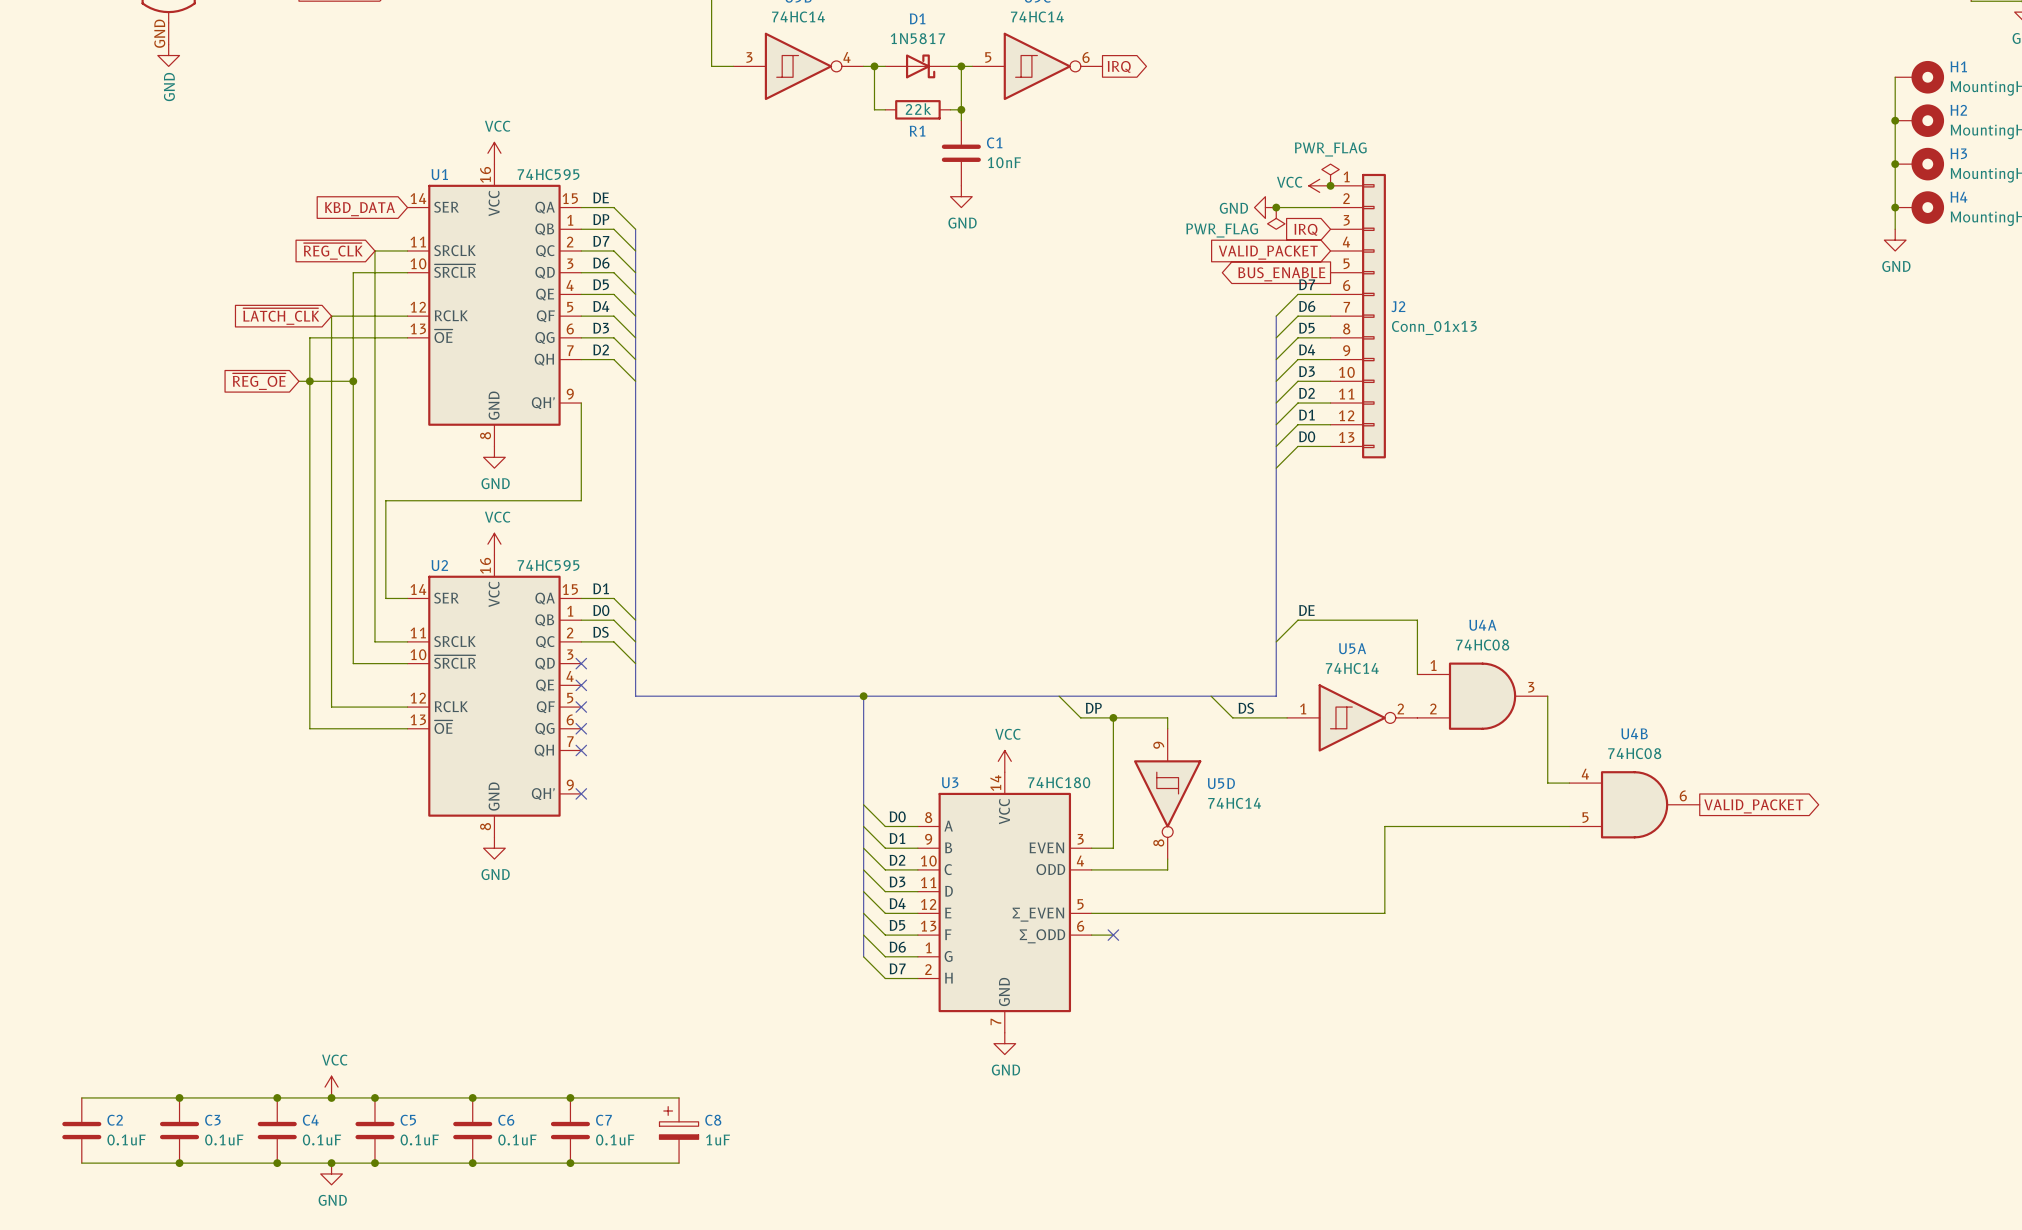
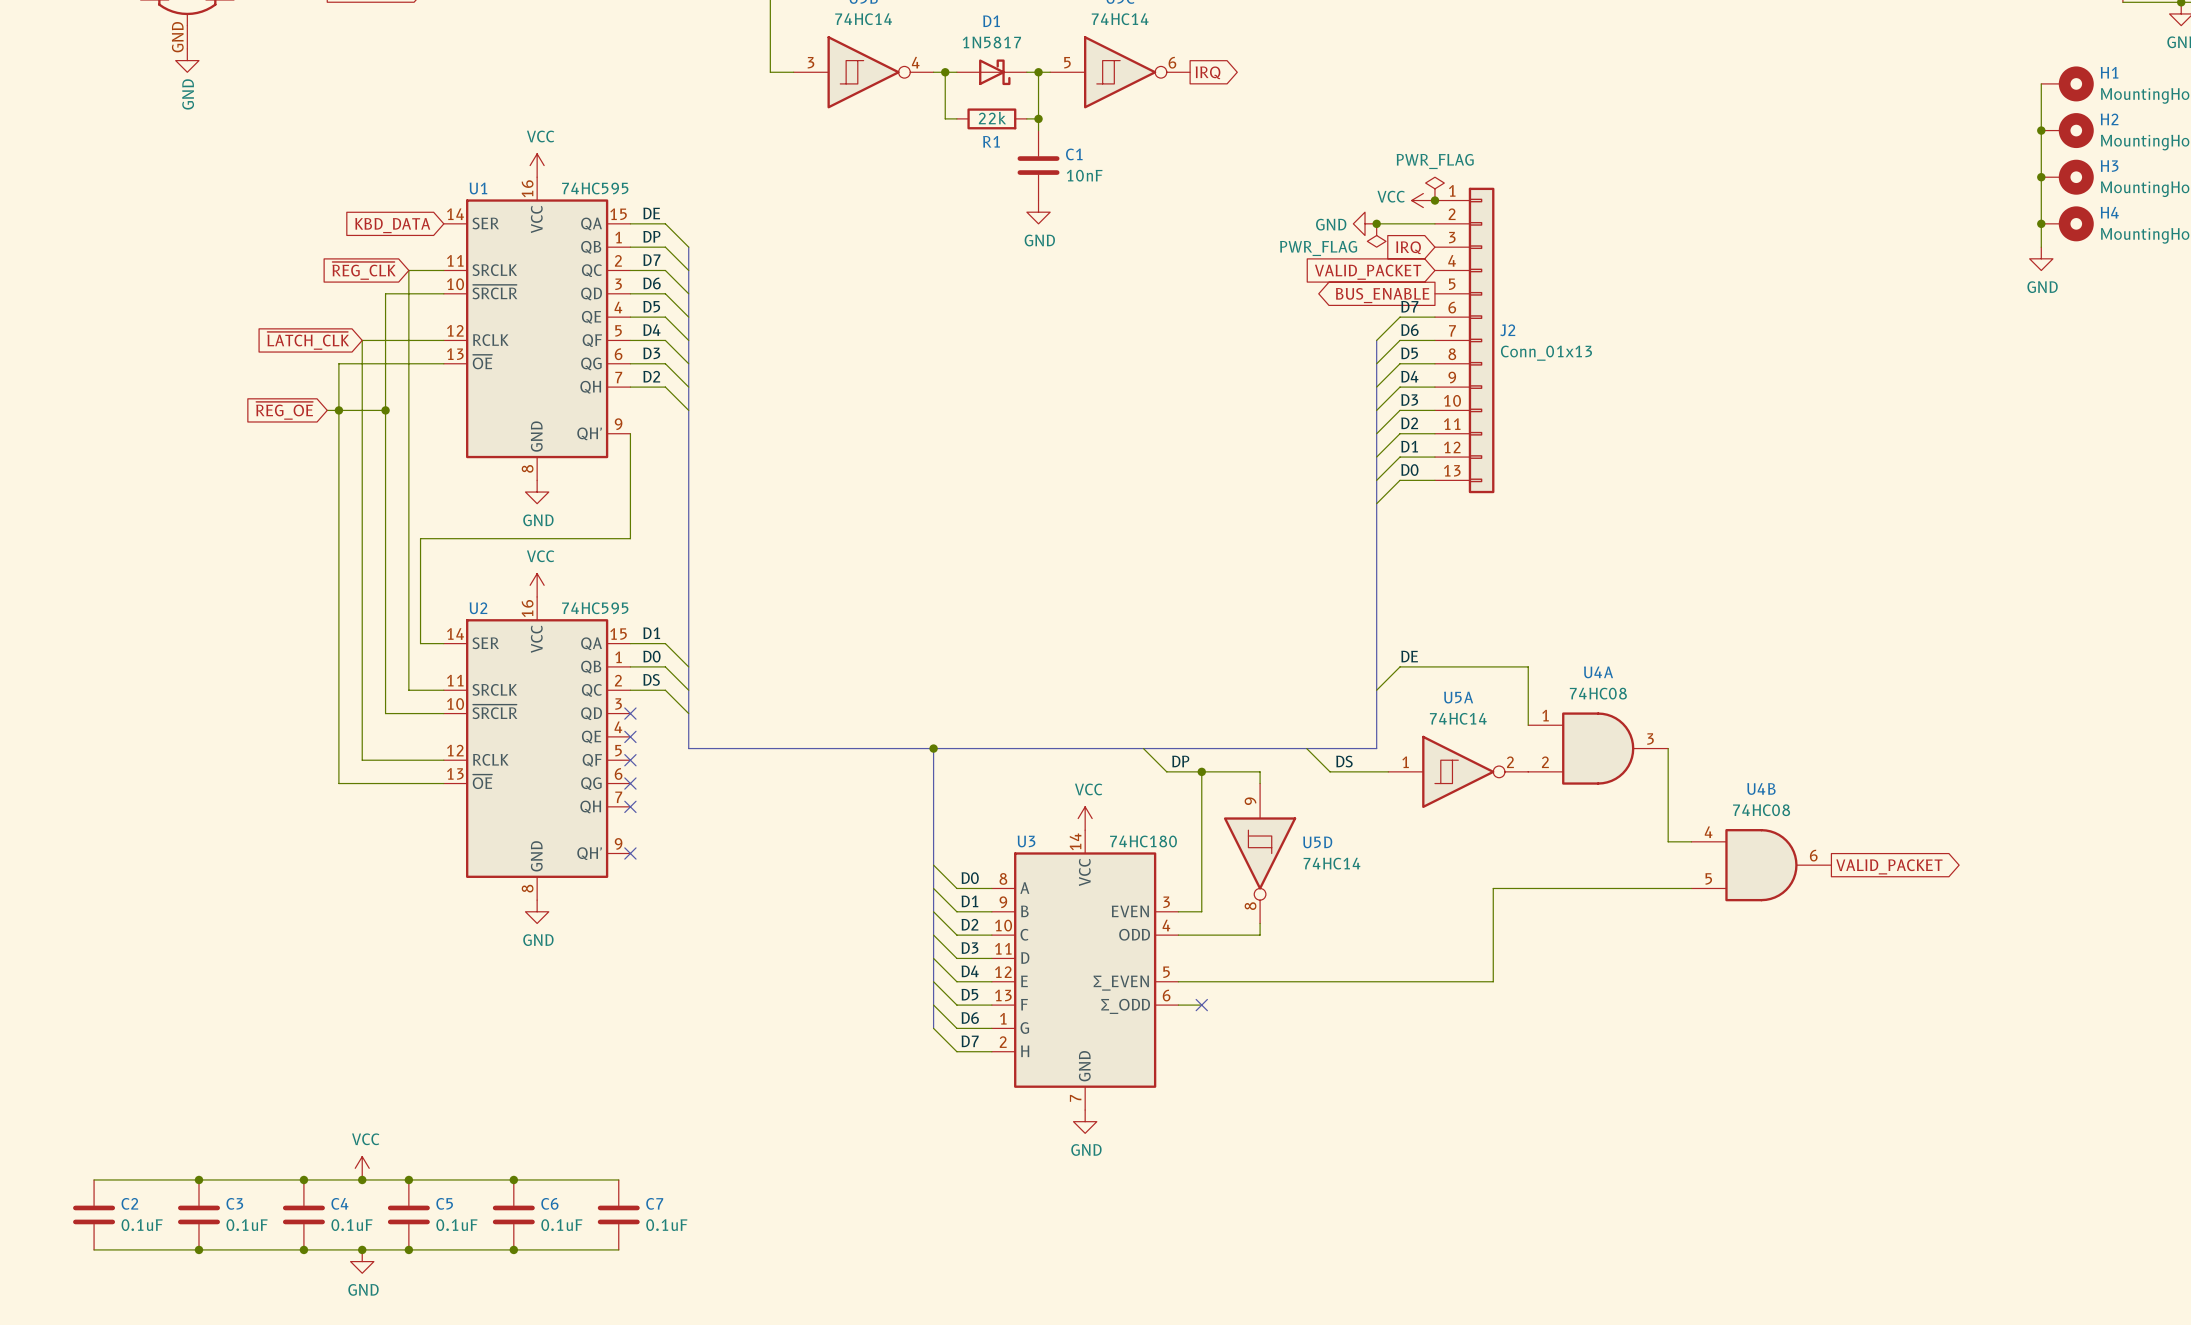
wire: (570, 1097) (679, 1097) -> none
junction: (570, 1097) -> none
C8: 1uF (679, 1130) -> none
wire: (570, 1163) (679, 1163) -> none
junction: (570, 1163) -> none

